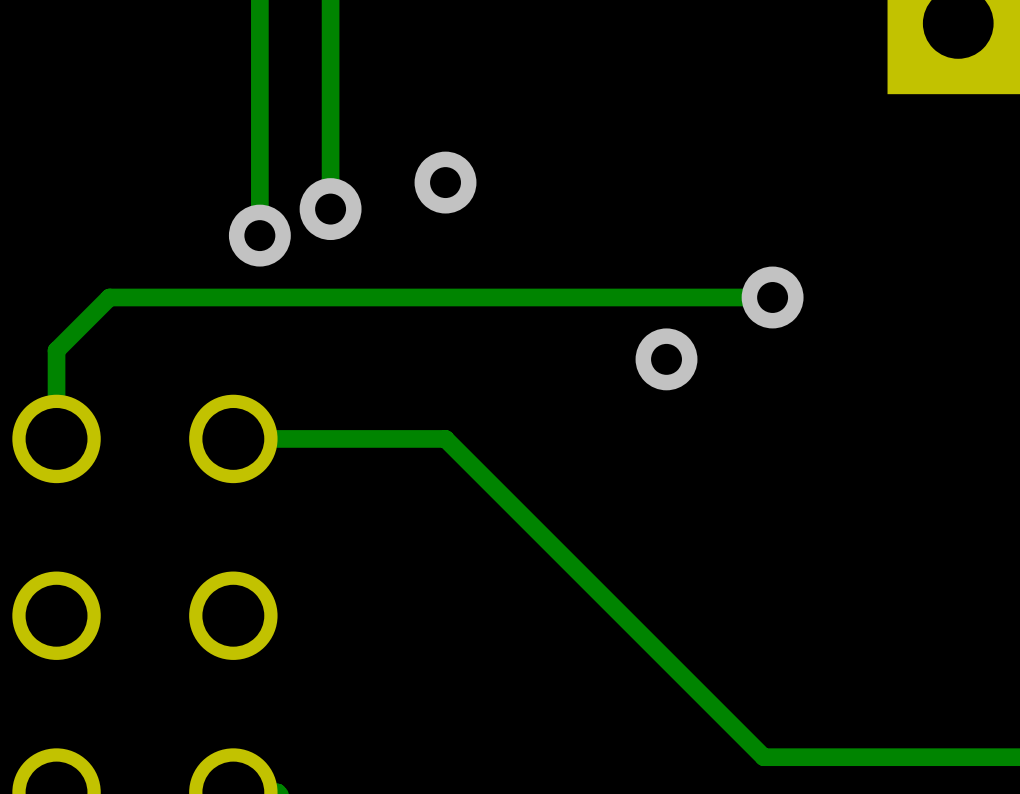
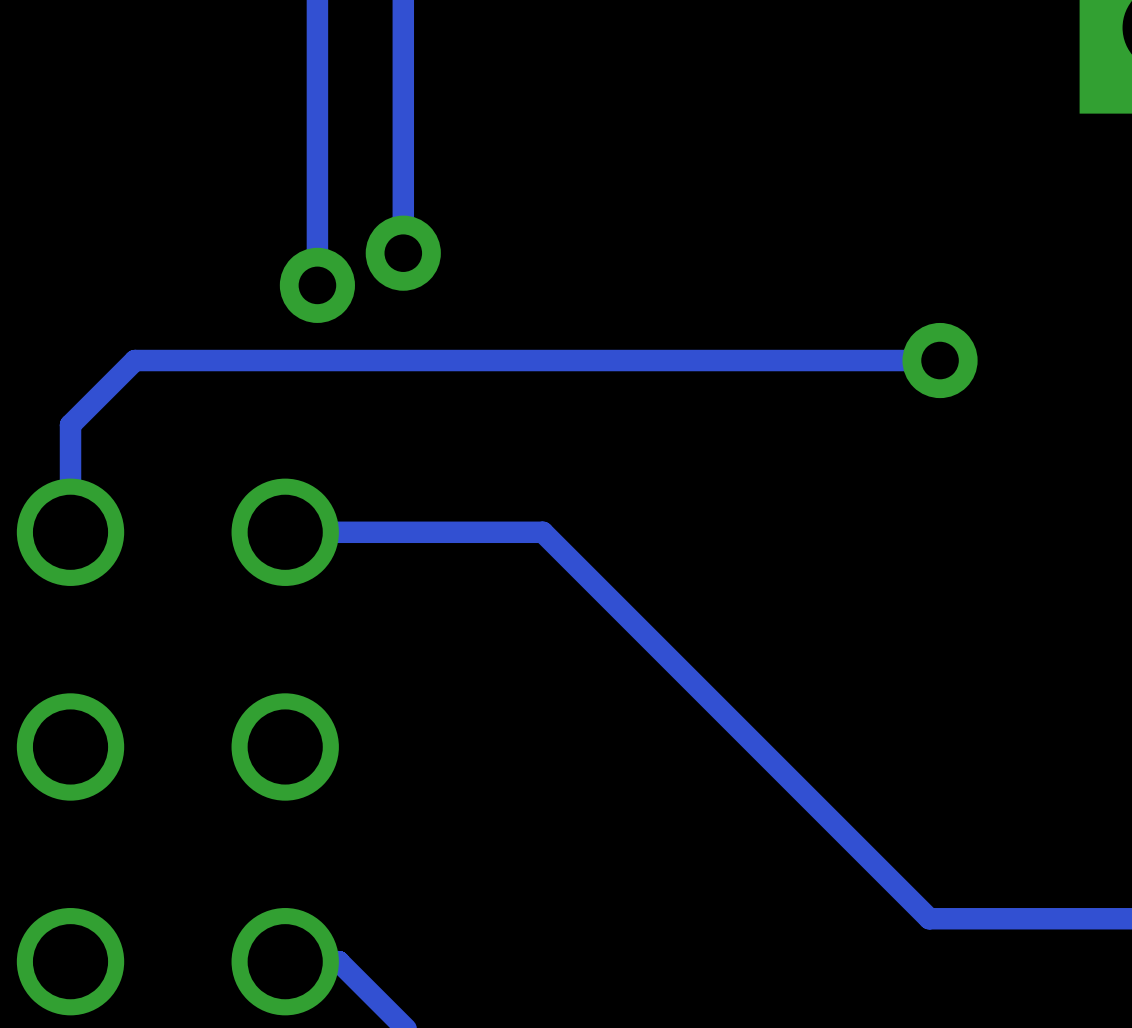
via: (445, 182) -> none
via: (666, 359) -> none

